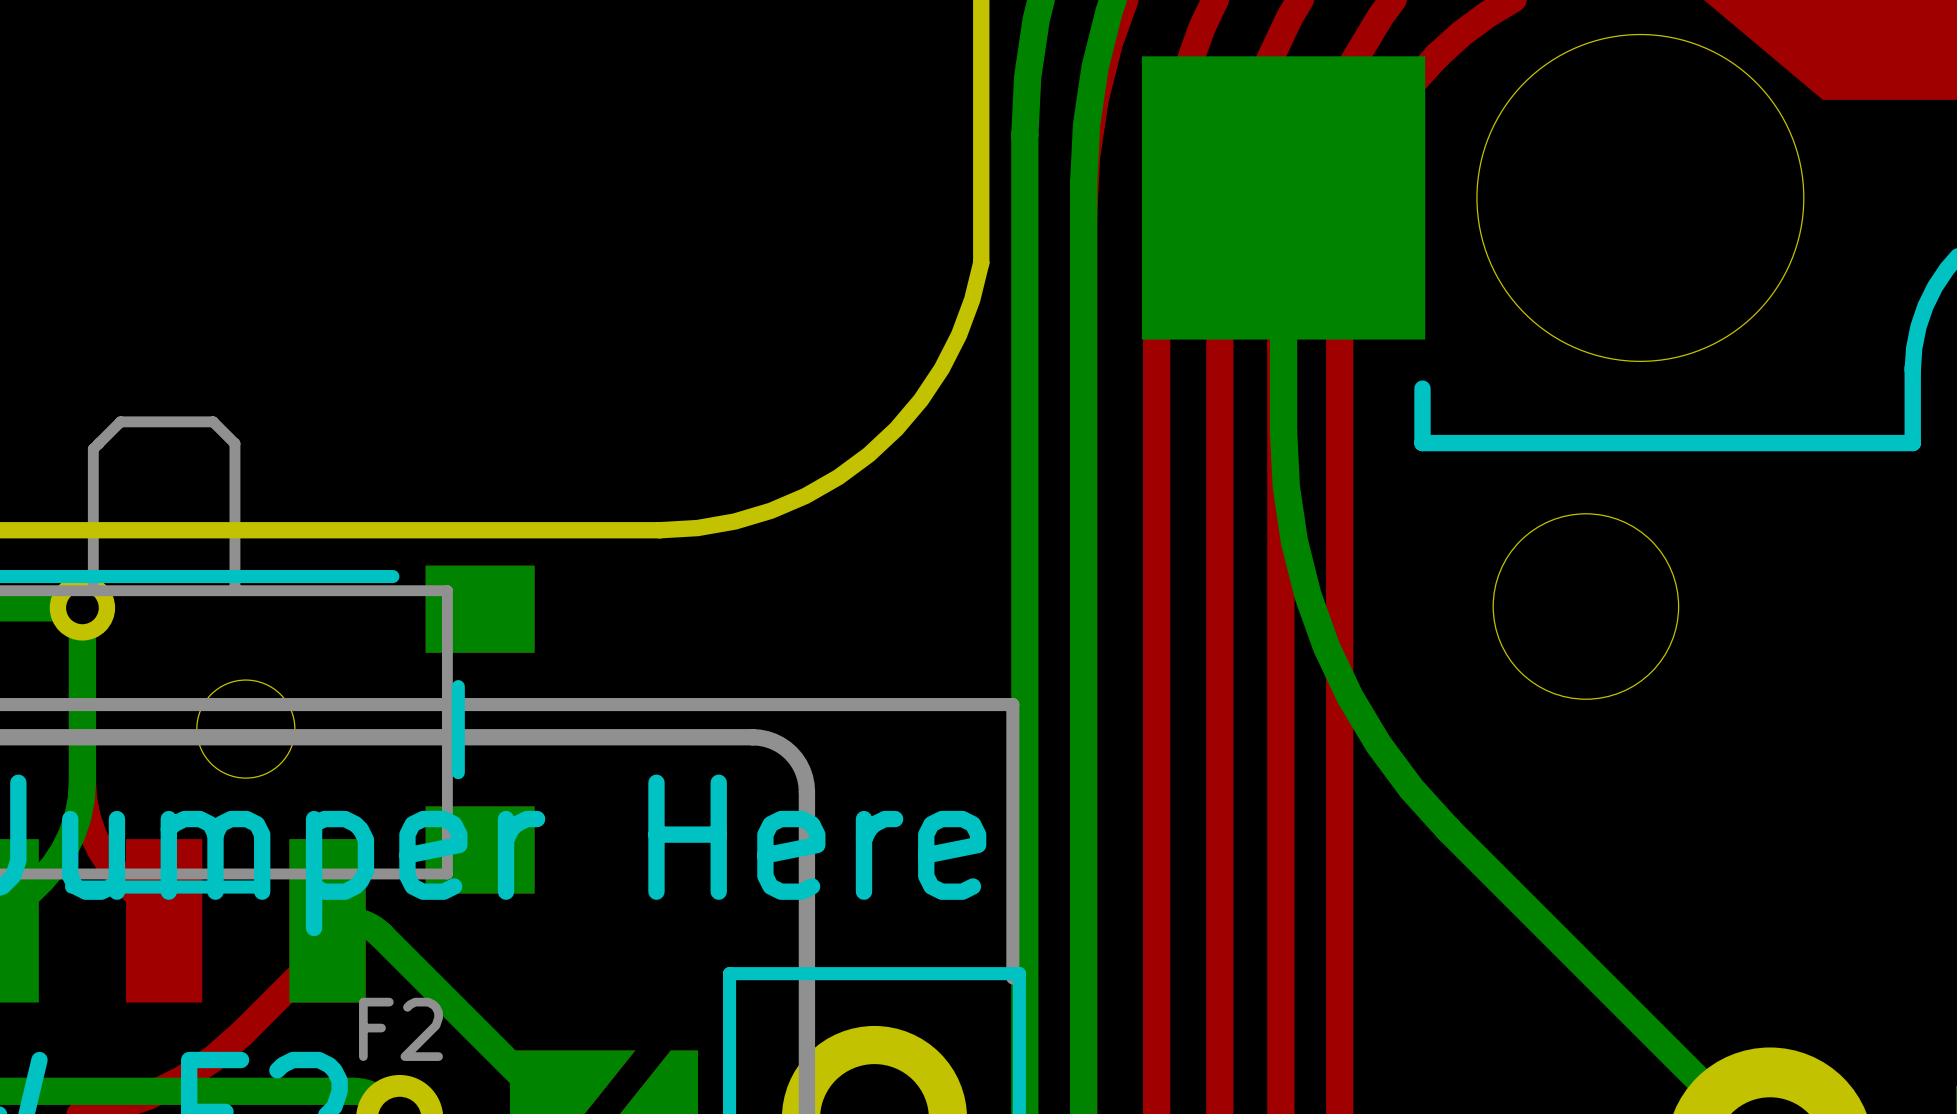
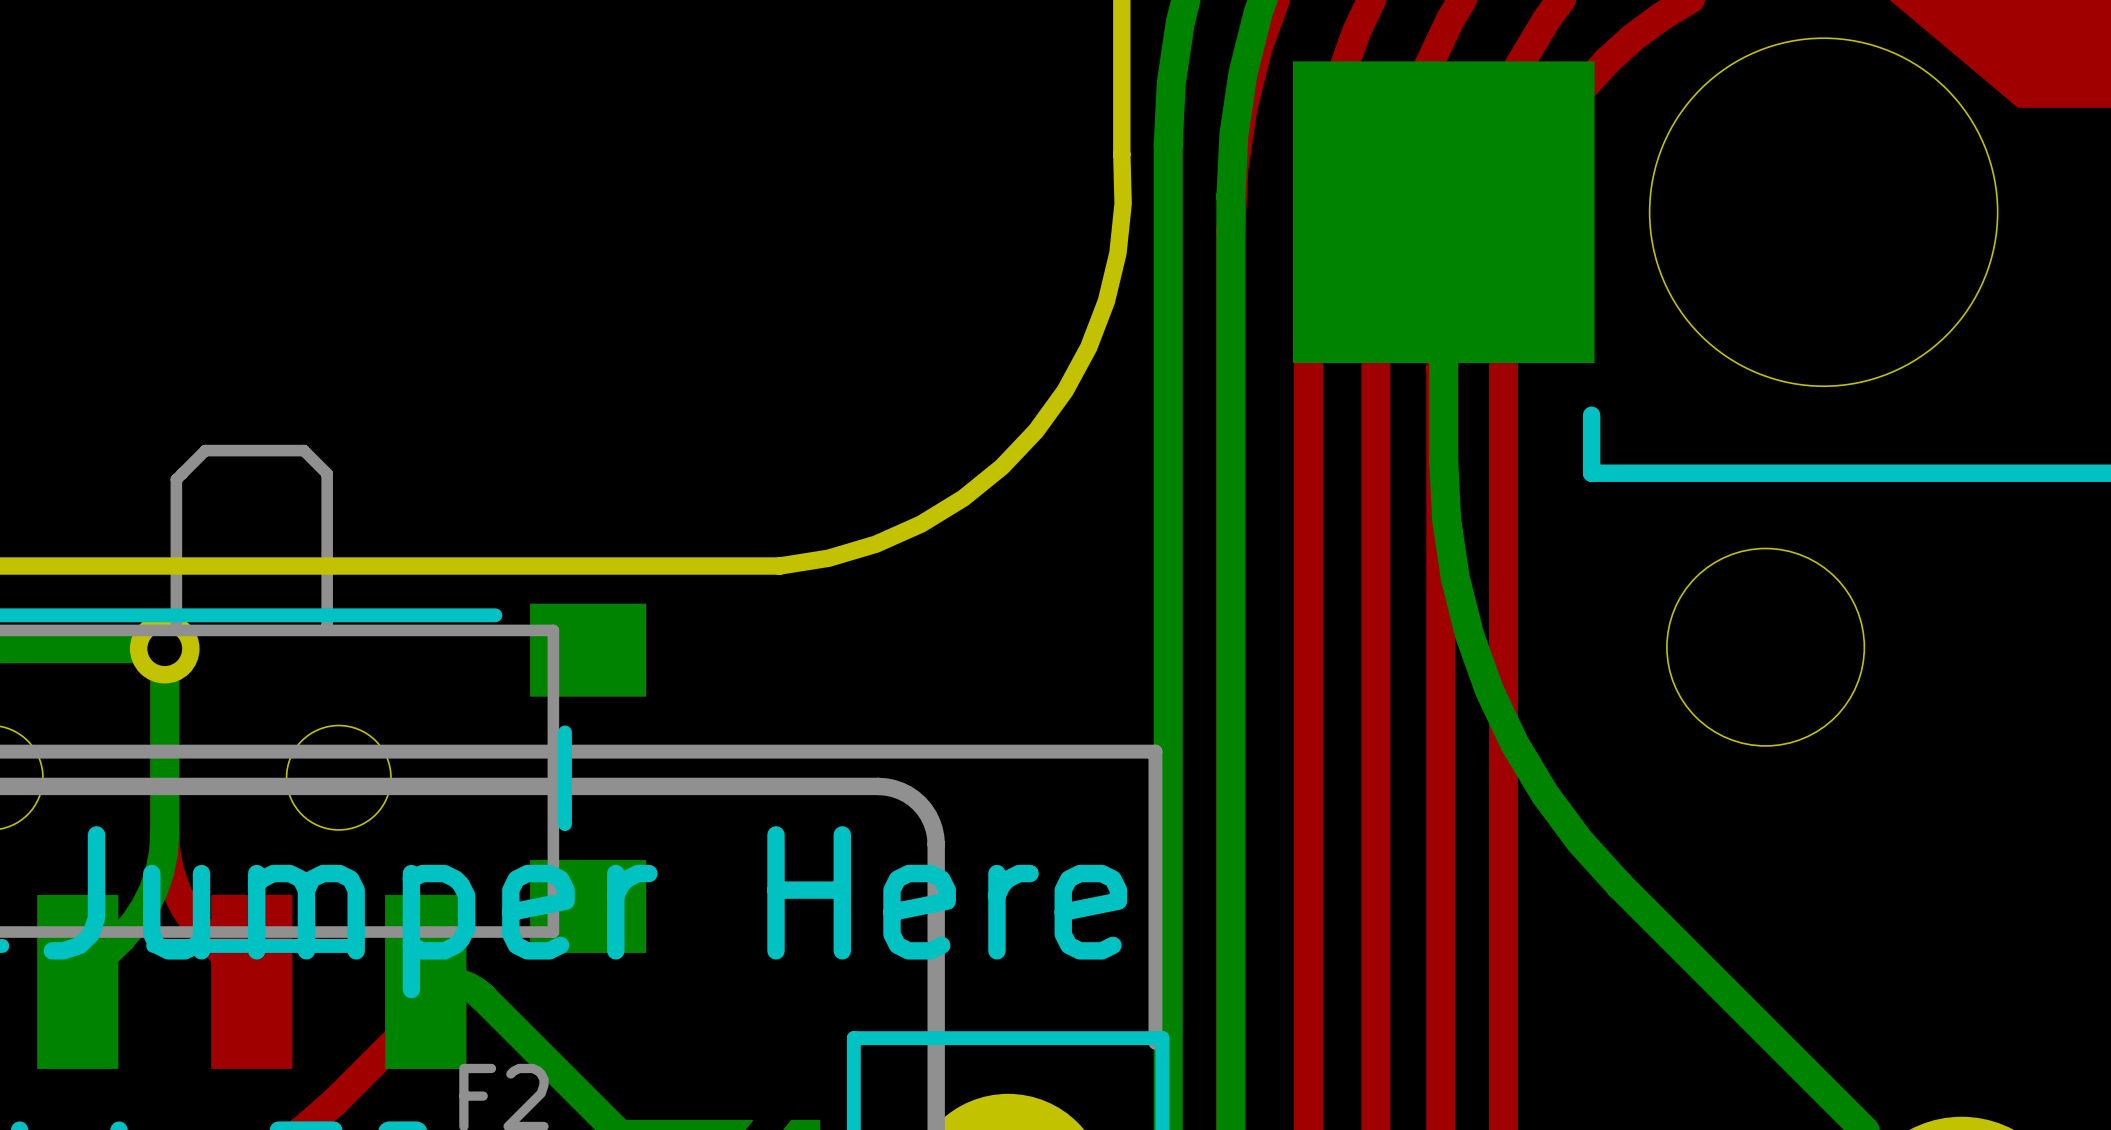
board edge: (981, 143) (981, 262) (972, 299) (959, 334) (941, 368) (920, 400) (896, 428) (868, 454) (838, 477) (805, 495) (771, 510) (734, 521) (697, 528) (659, 530) -> (1121, 154) (1123, 203) (1117, 252) (1106, 301) (1088, 347) (1065, 390) (1035, 430) (1001, 466) (963, 498) (921, 524) (875, 544) (828, 558) (779, 566)

